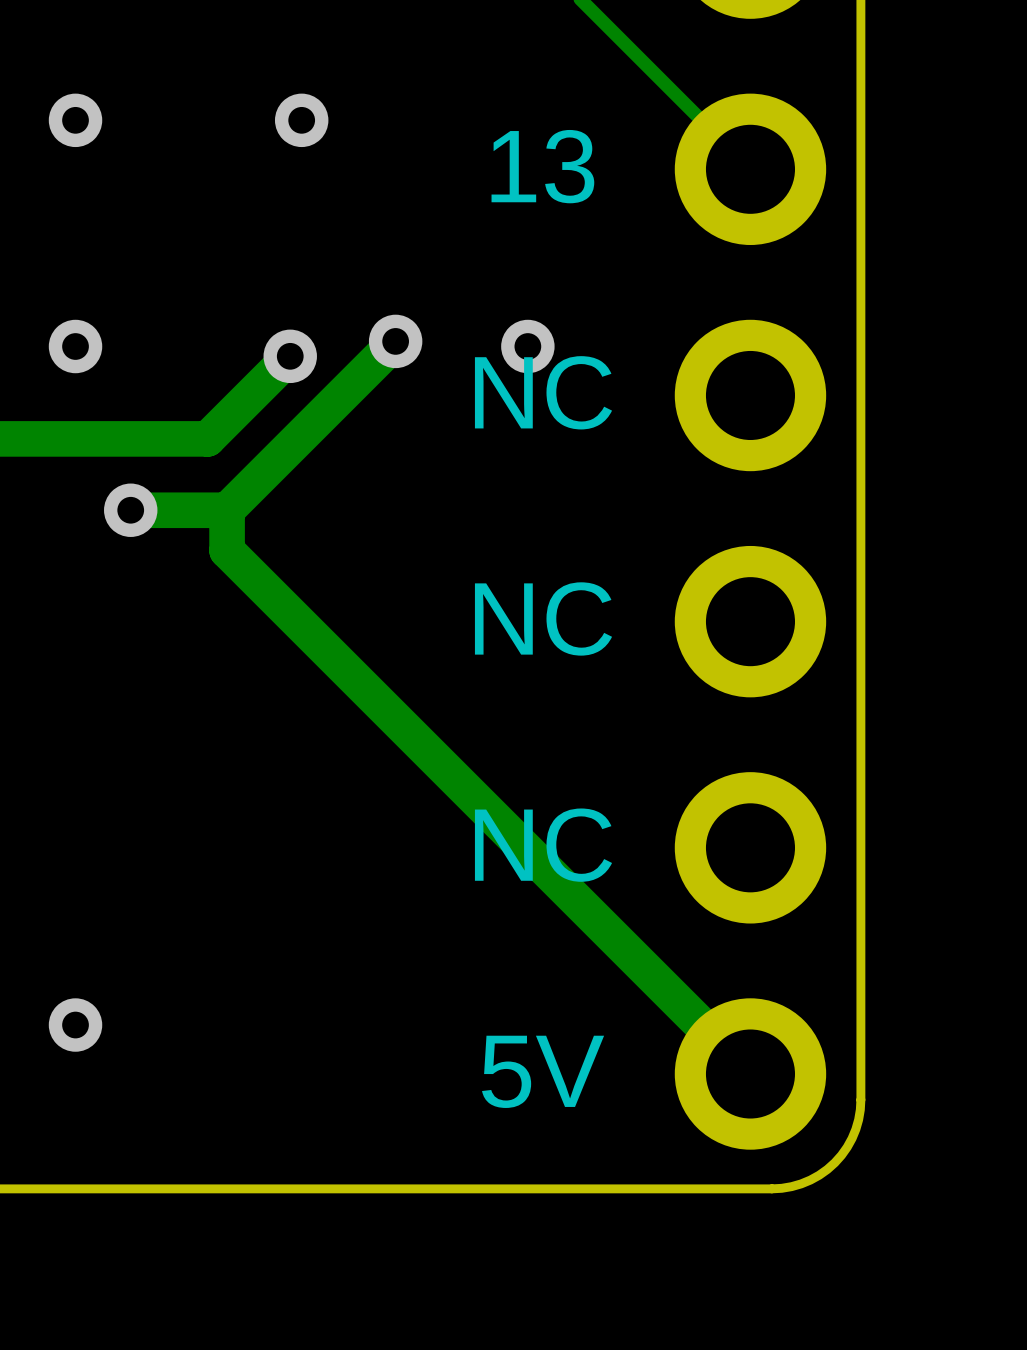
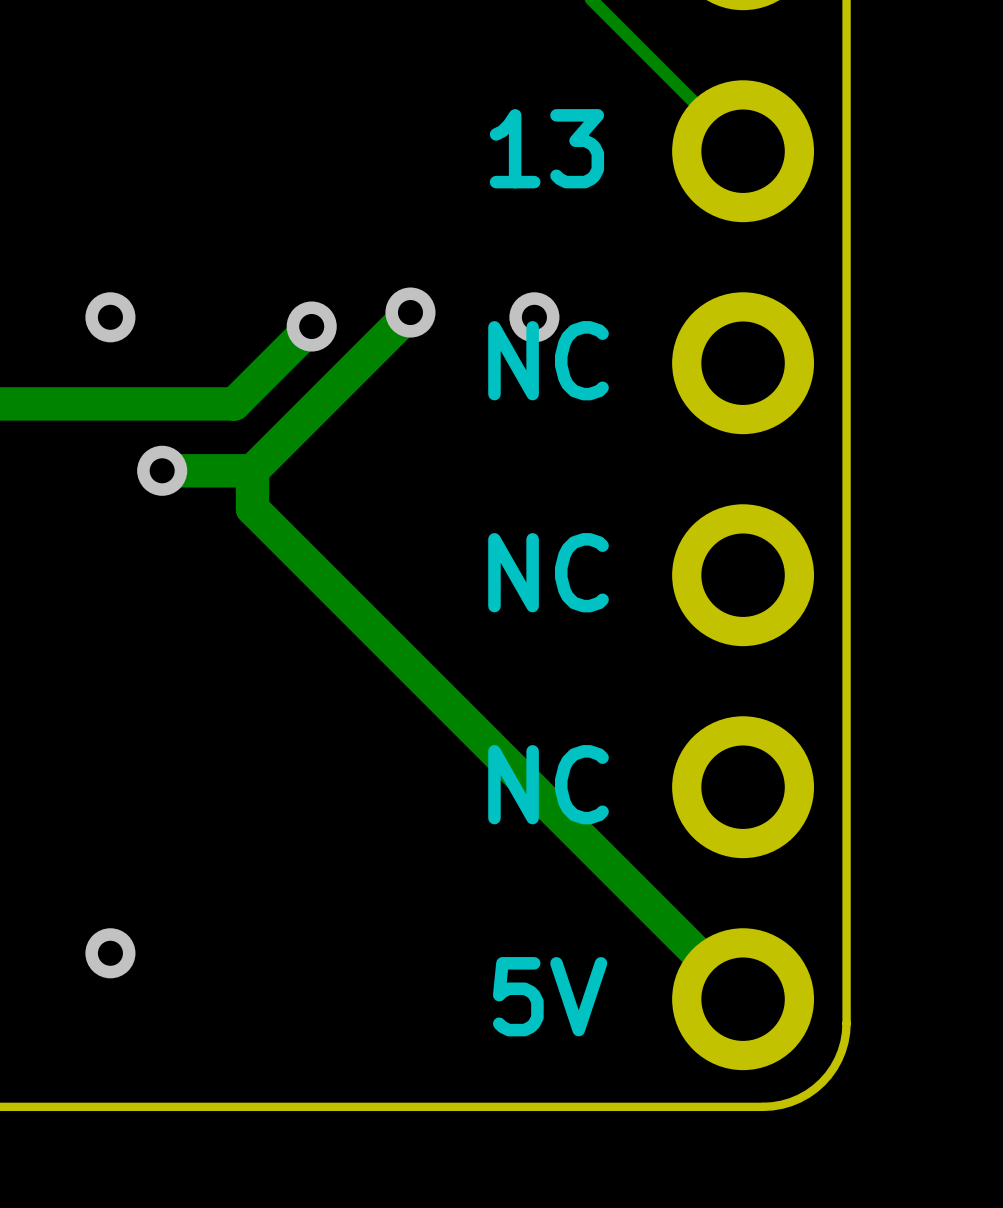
via: (75, 120) -> none
via: (301, 120) -> none

